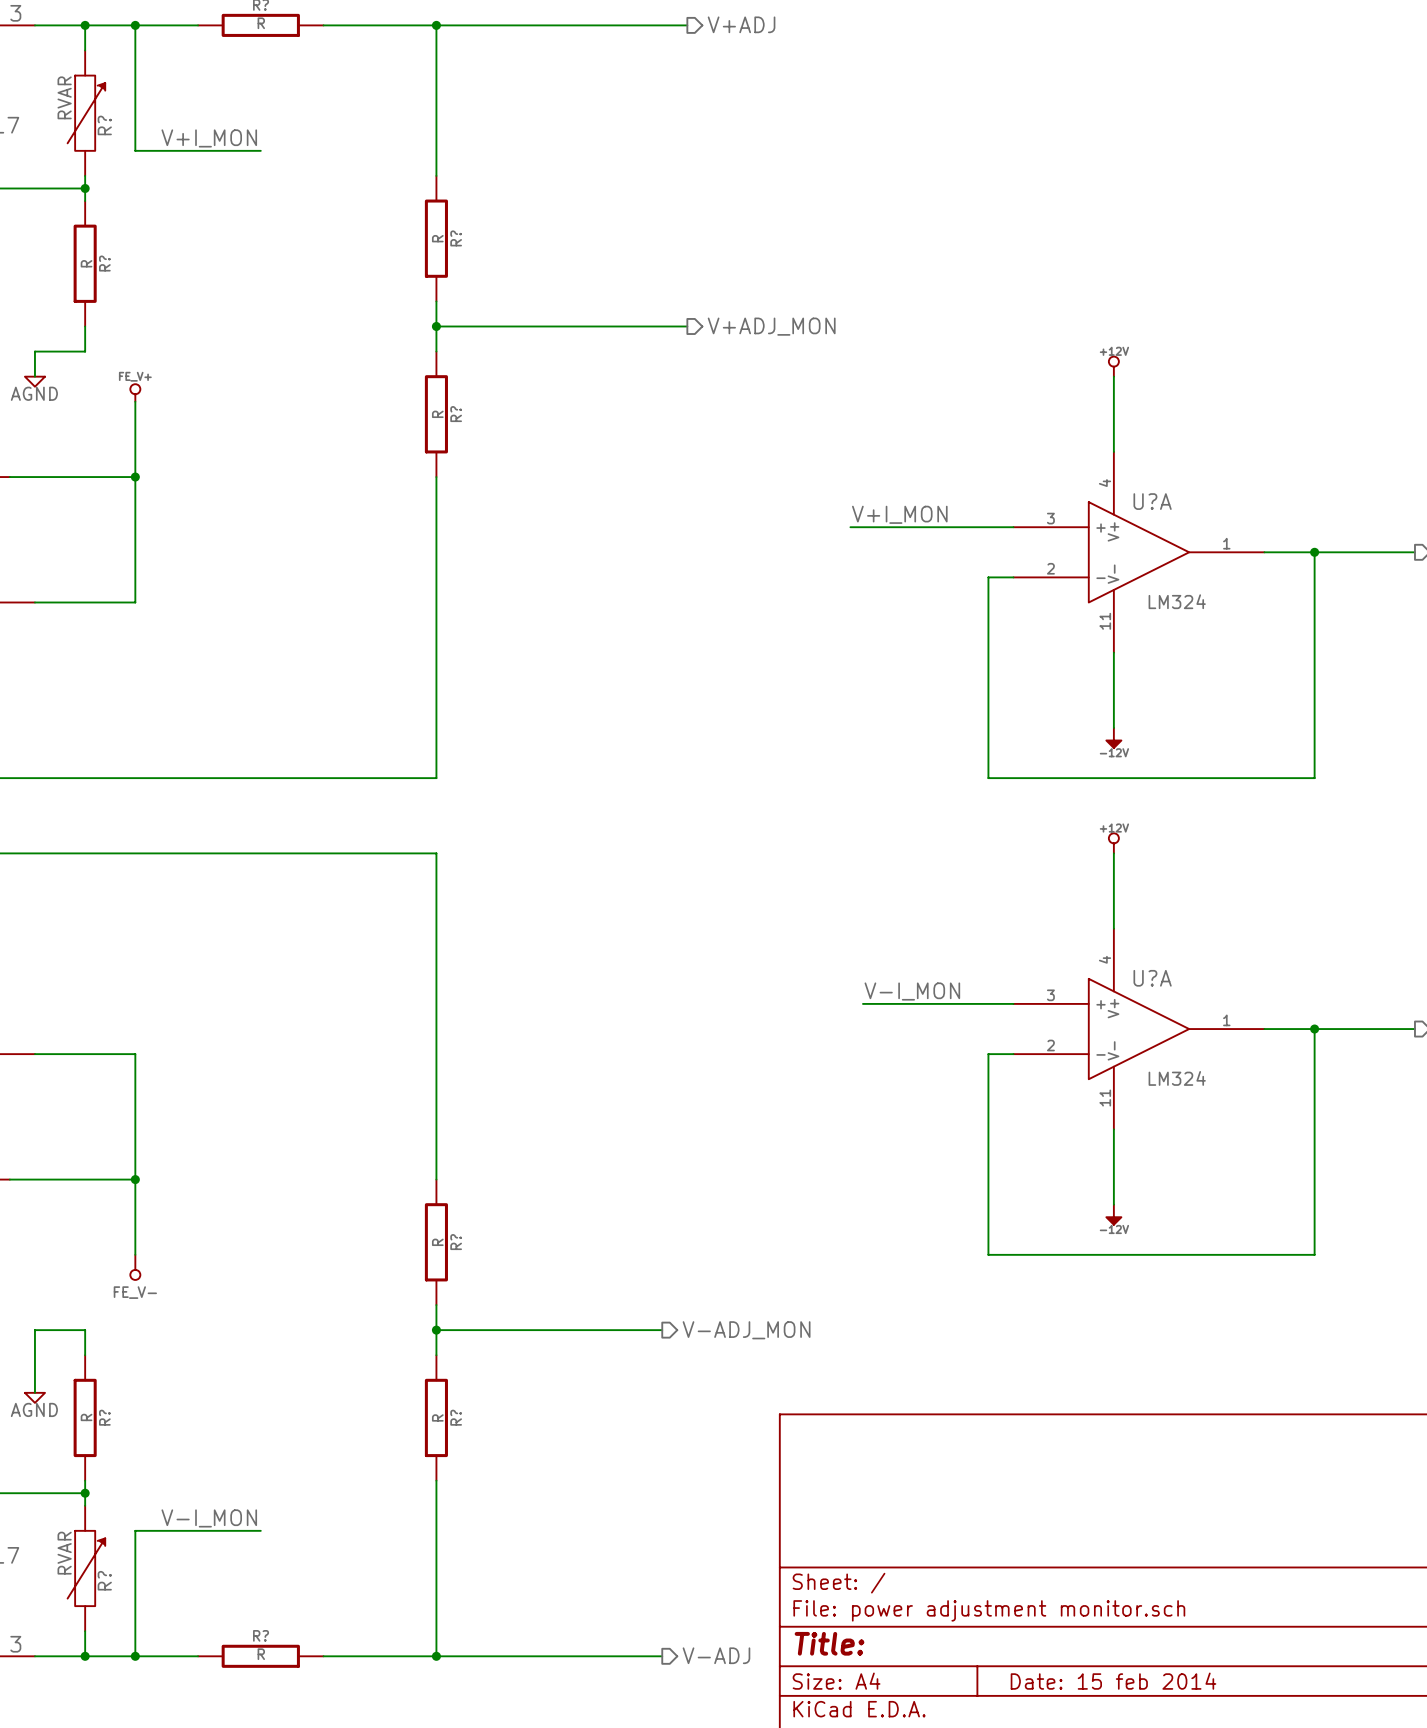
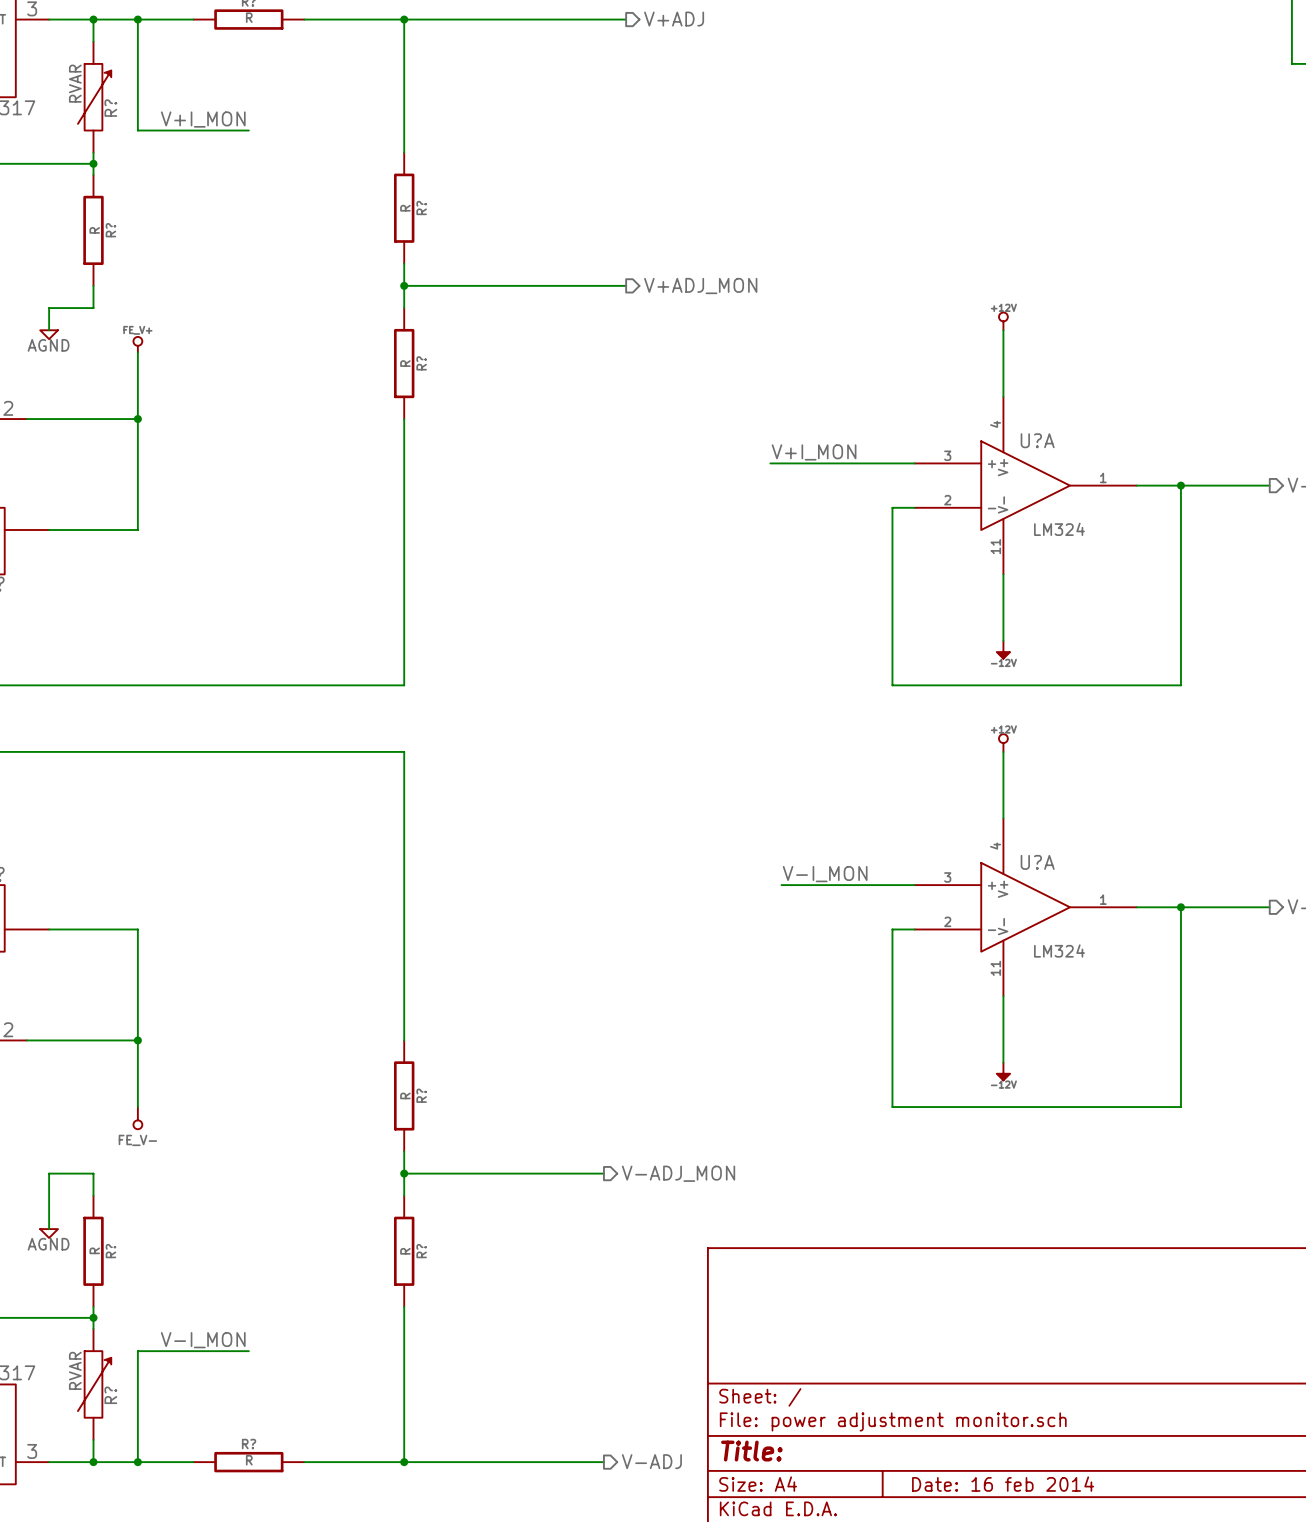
title block: Date: 15 feb 2014 (1113, 1681) -> Date: 16 feb 2014 (1003, 1484)

